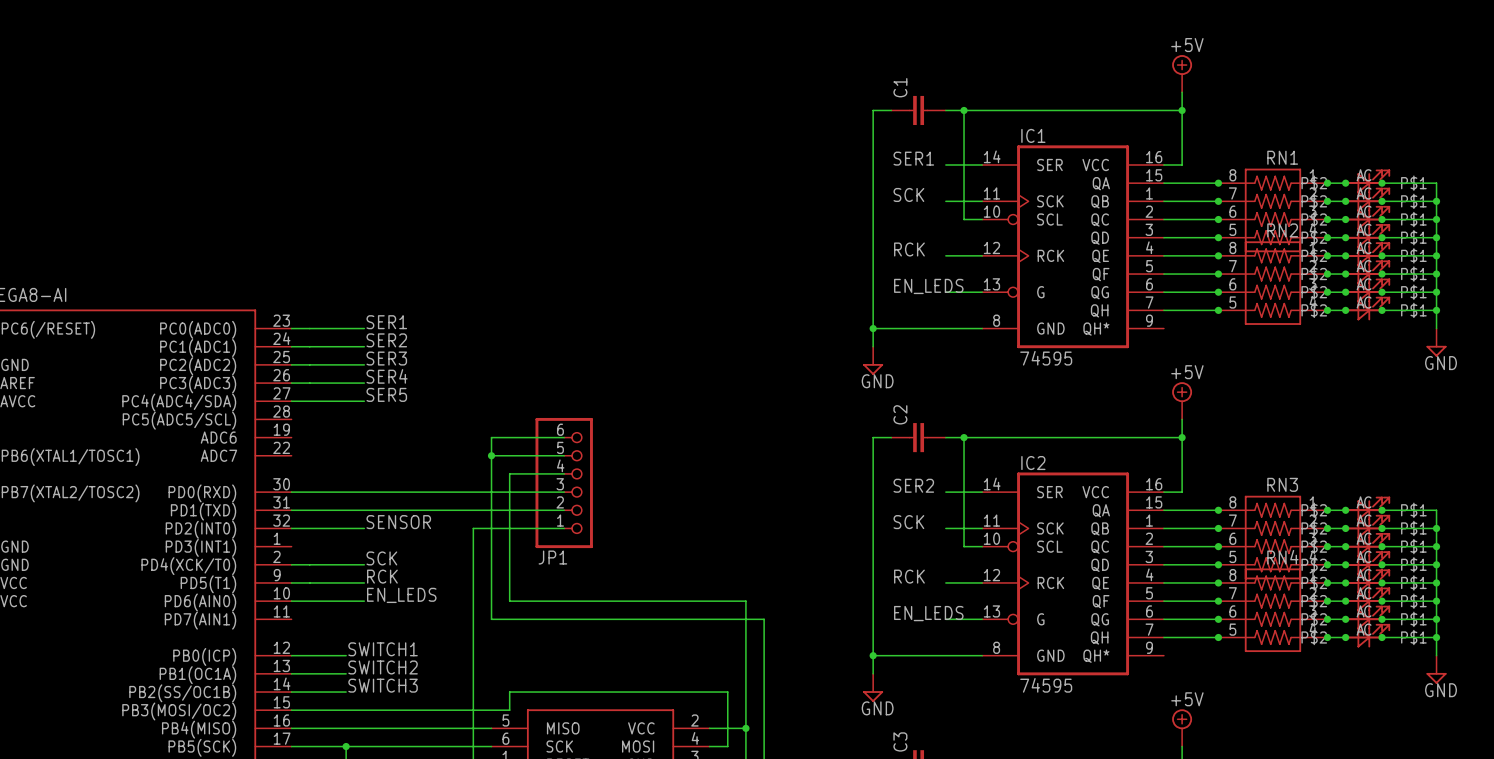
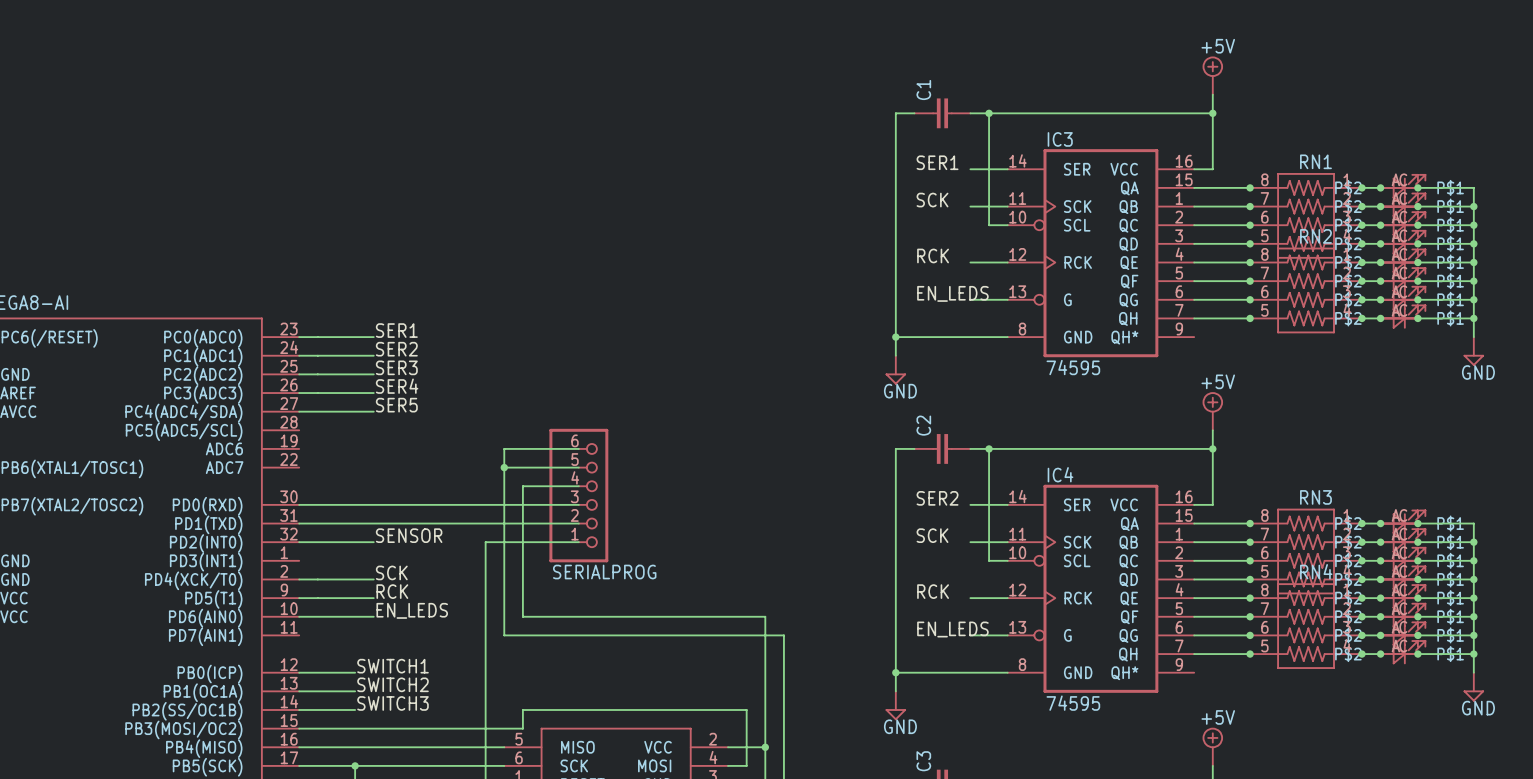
IC1 name: IC1 (1033, 135) -> IC3 (1060, 139)
IC2 name: IC2 (1033, 463) -> IC4 (1060, 474)
JP1 name: JP1 (552, 557) -> SERIALPROG (604, 572)

